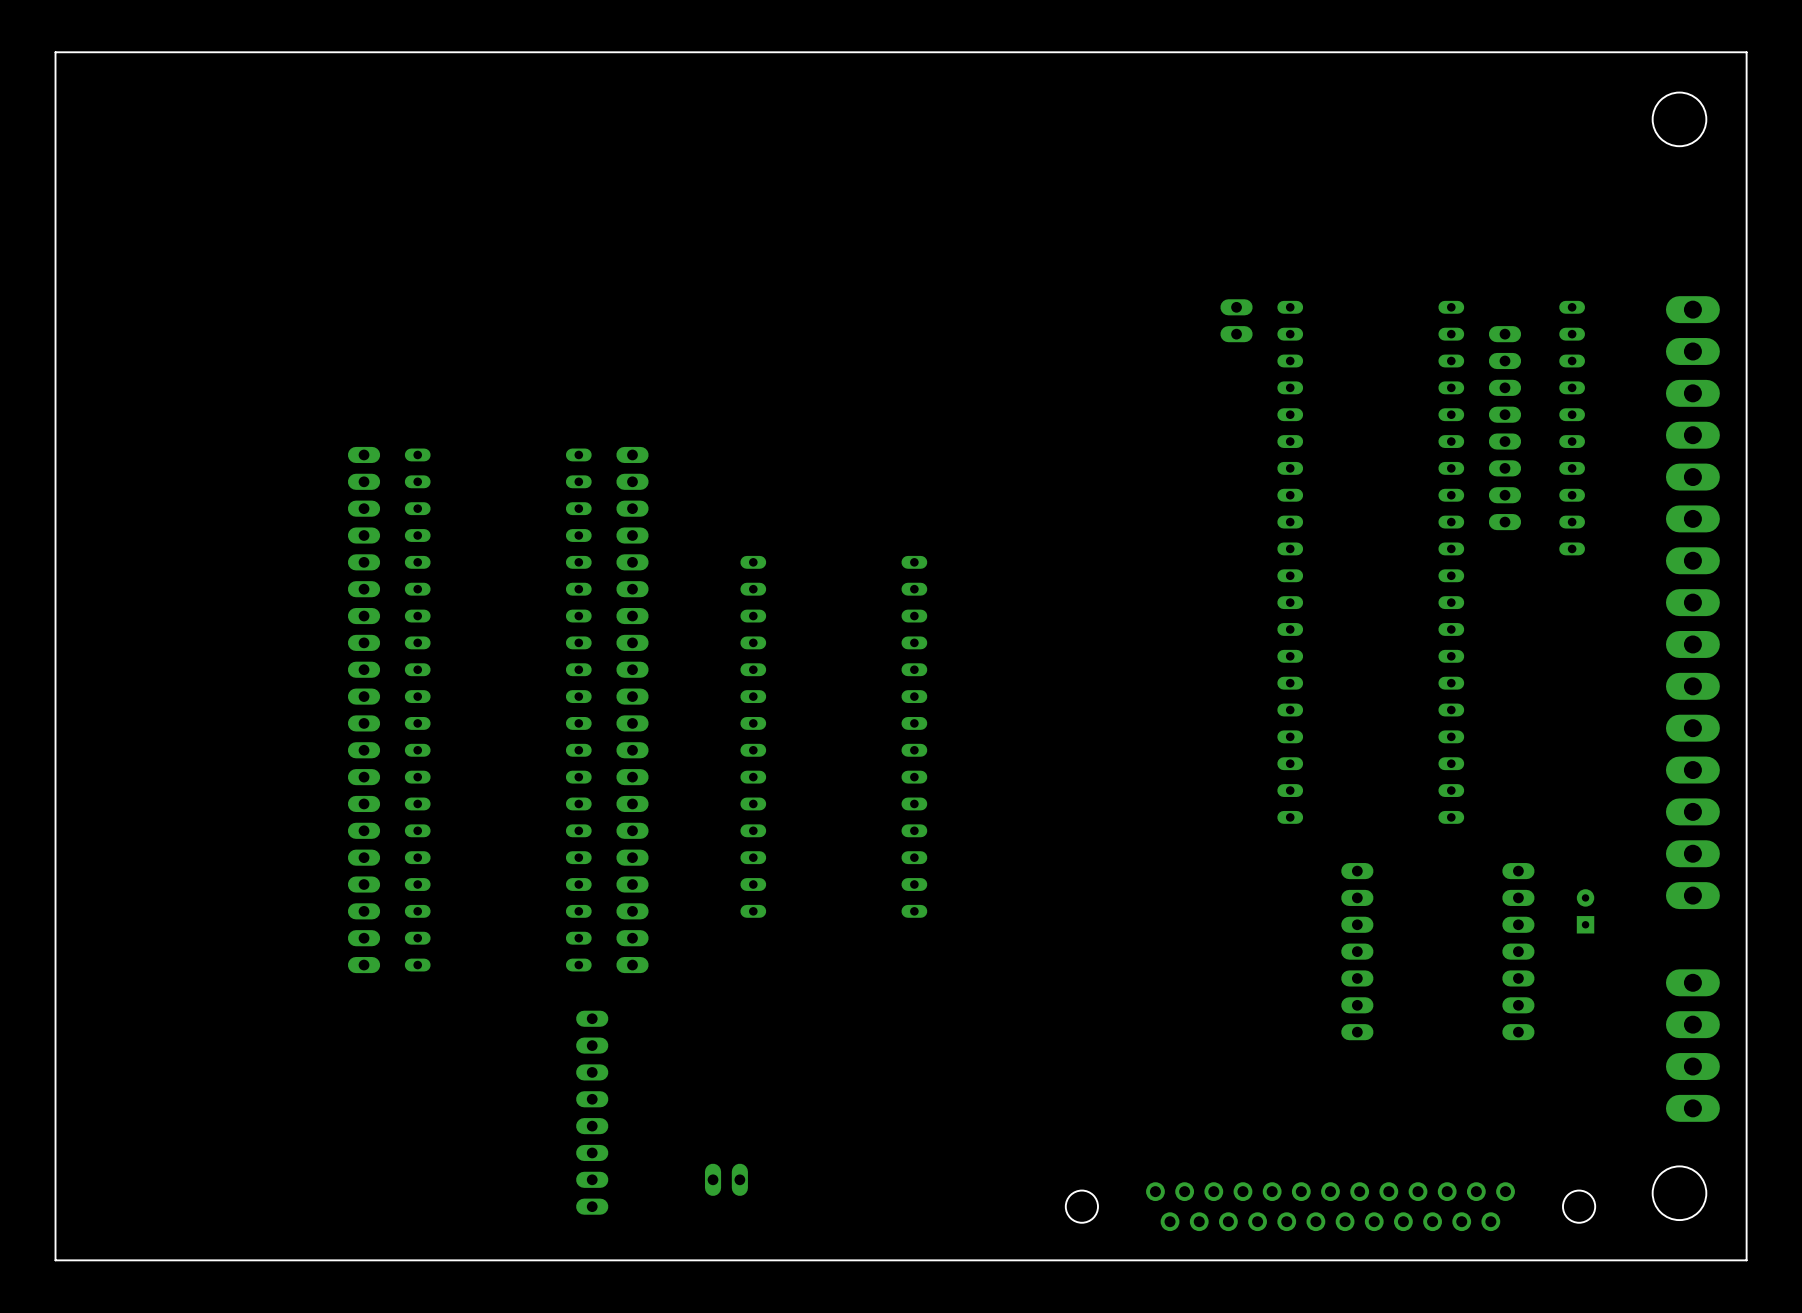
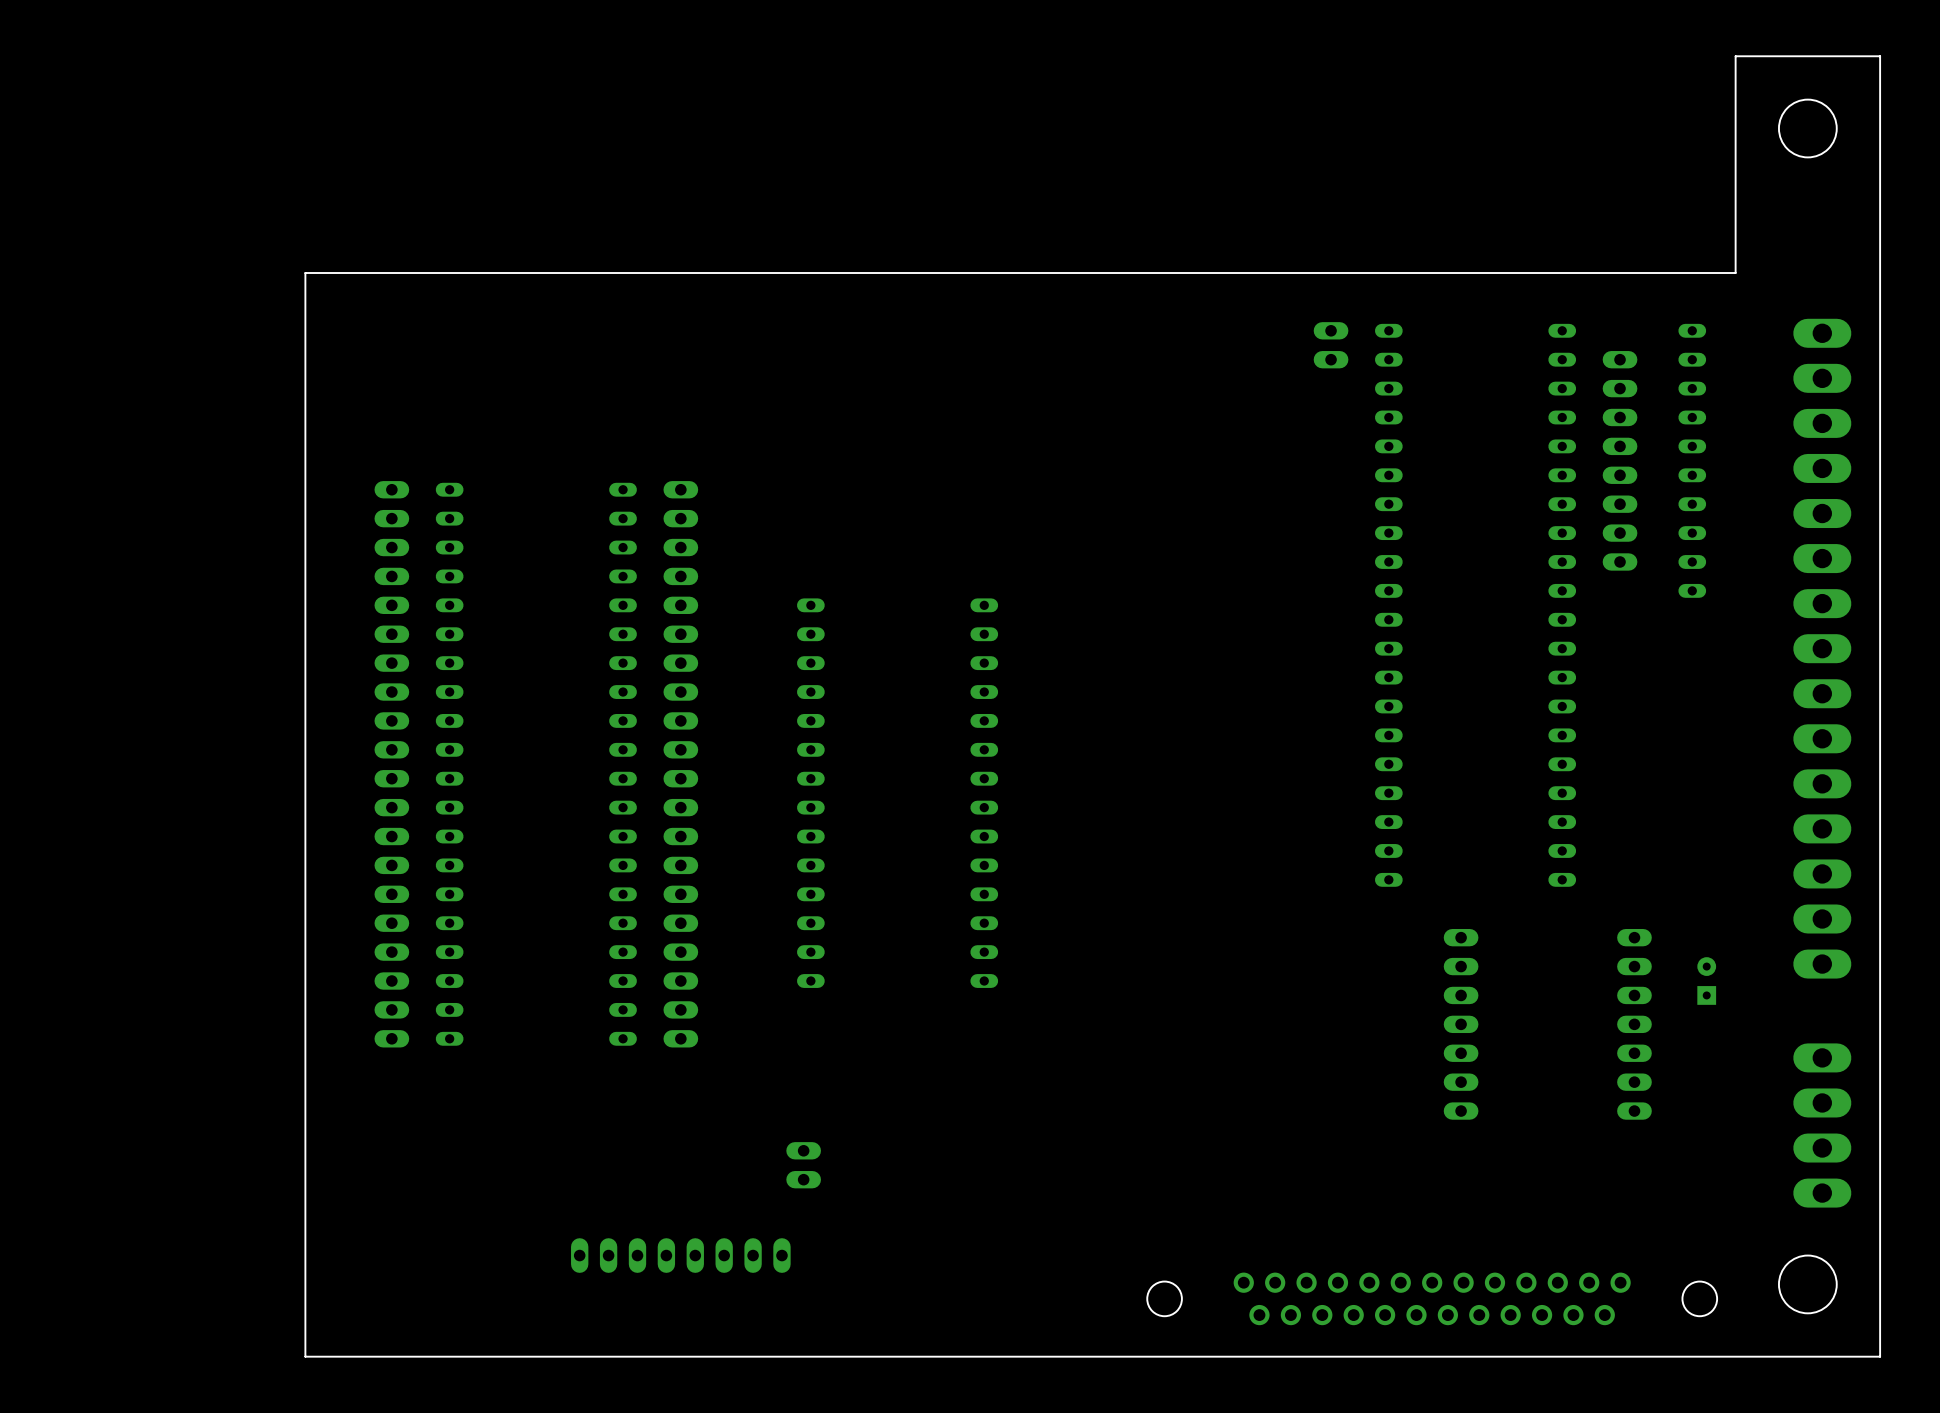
board edge: (1612, 52) (55, 52) (55, 1260) (283, 1260) -> (1735, 56) (1735, 273) (305, 273) (305, 1356)
part rotation: 0° (592, 1112) -> 90° clockwise (680, 1255)
part rotation: 0° (726, 1179) -> 90° clockwise (803, 1165)
part position: (726, 1179) -> (803, 1165)

